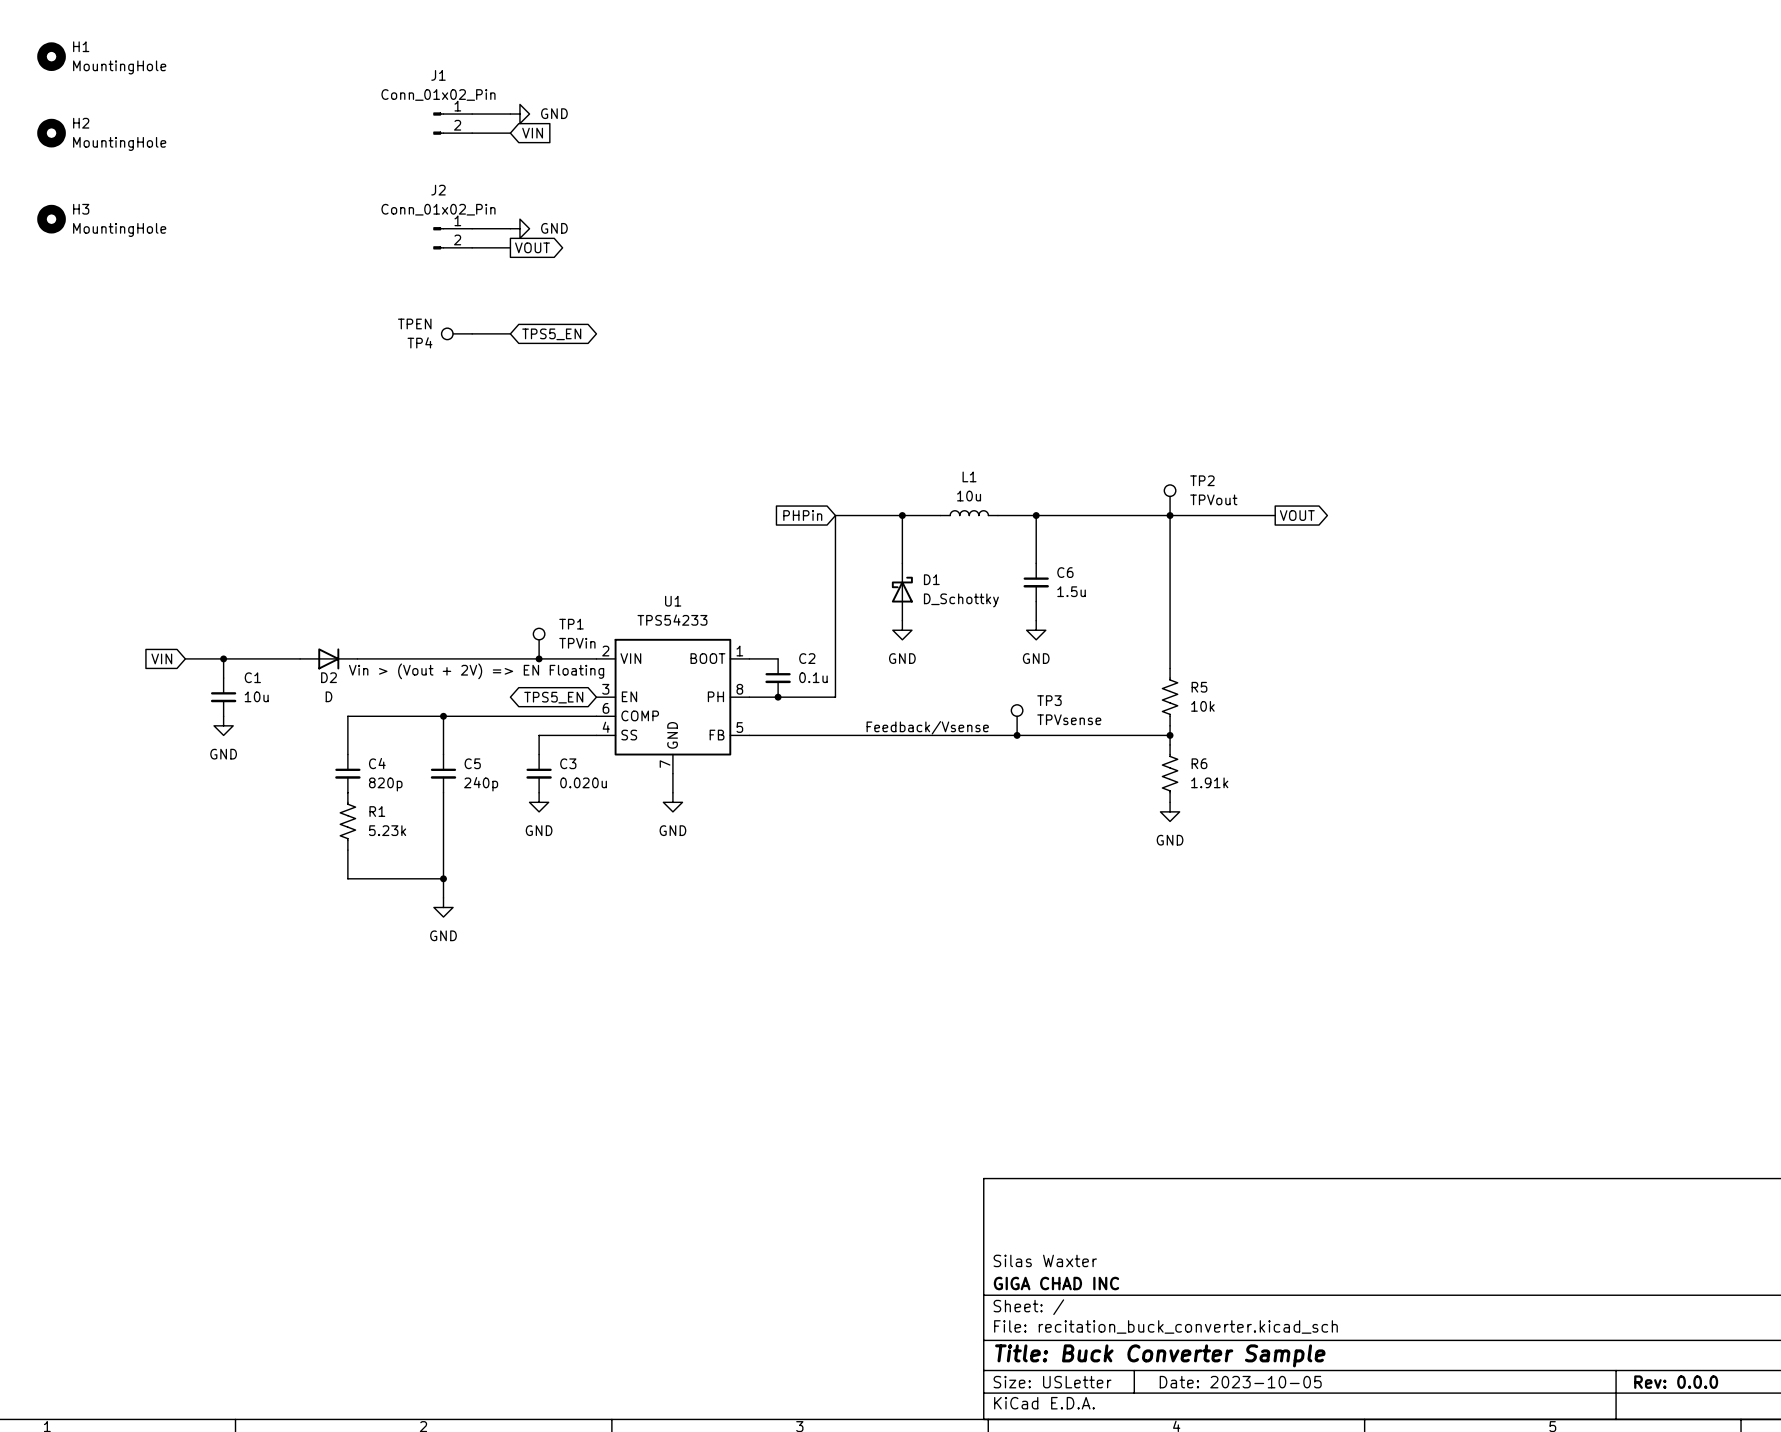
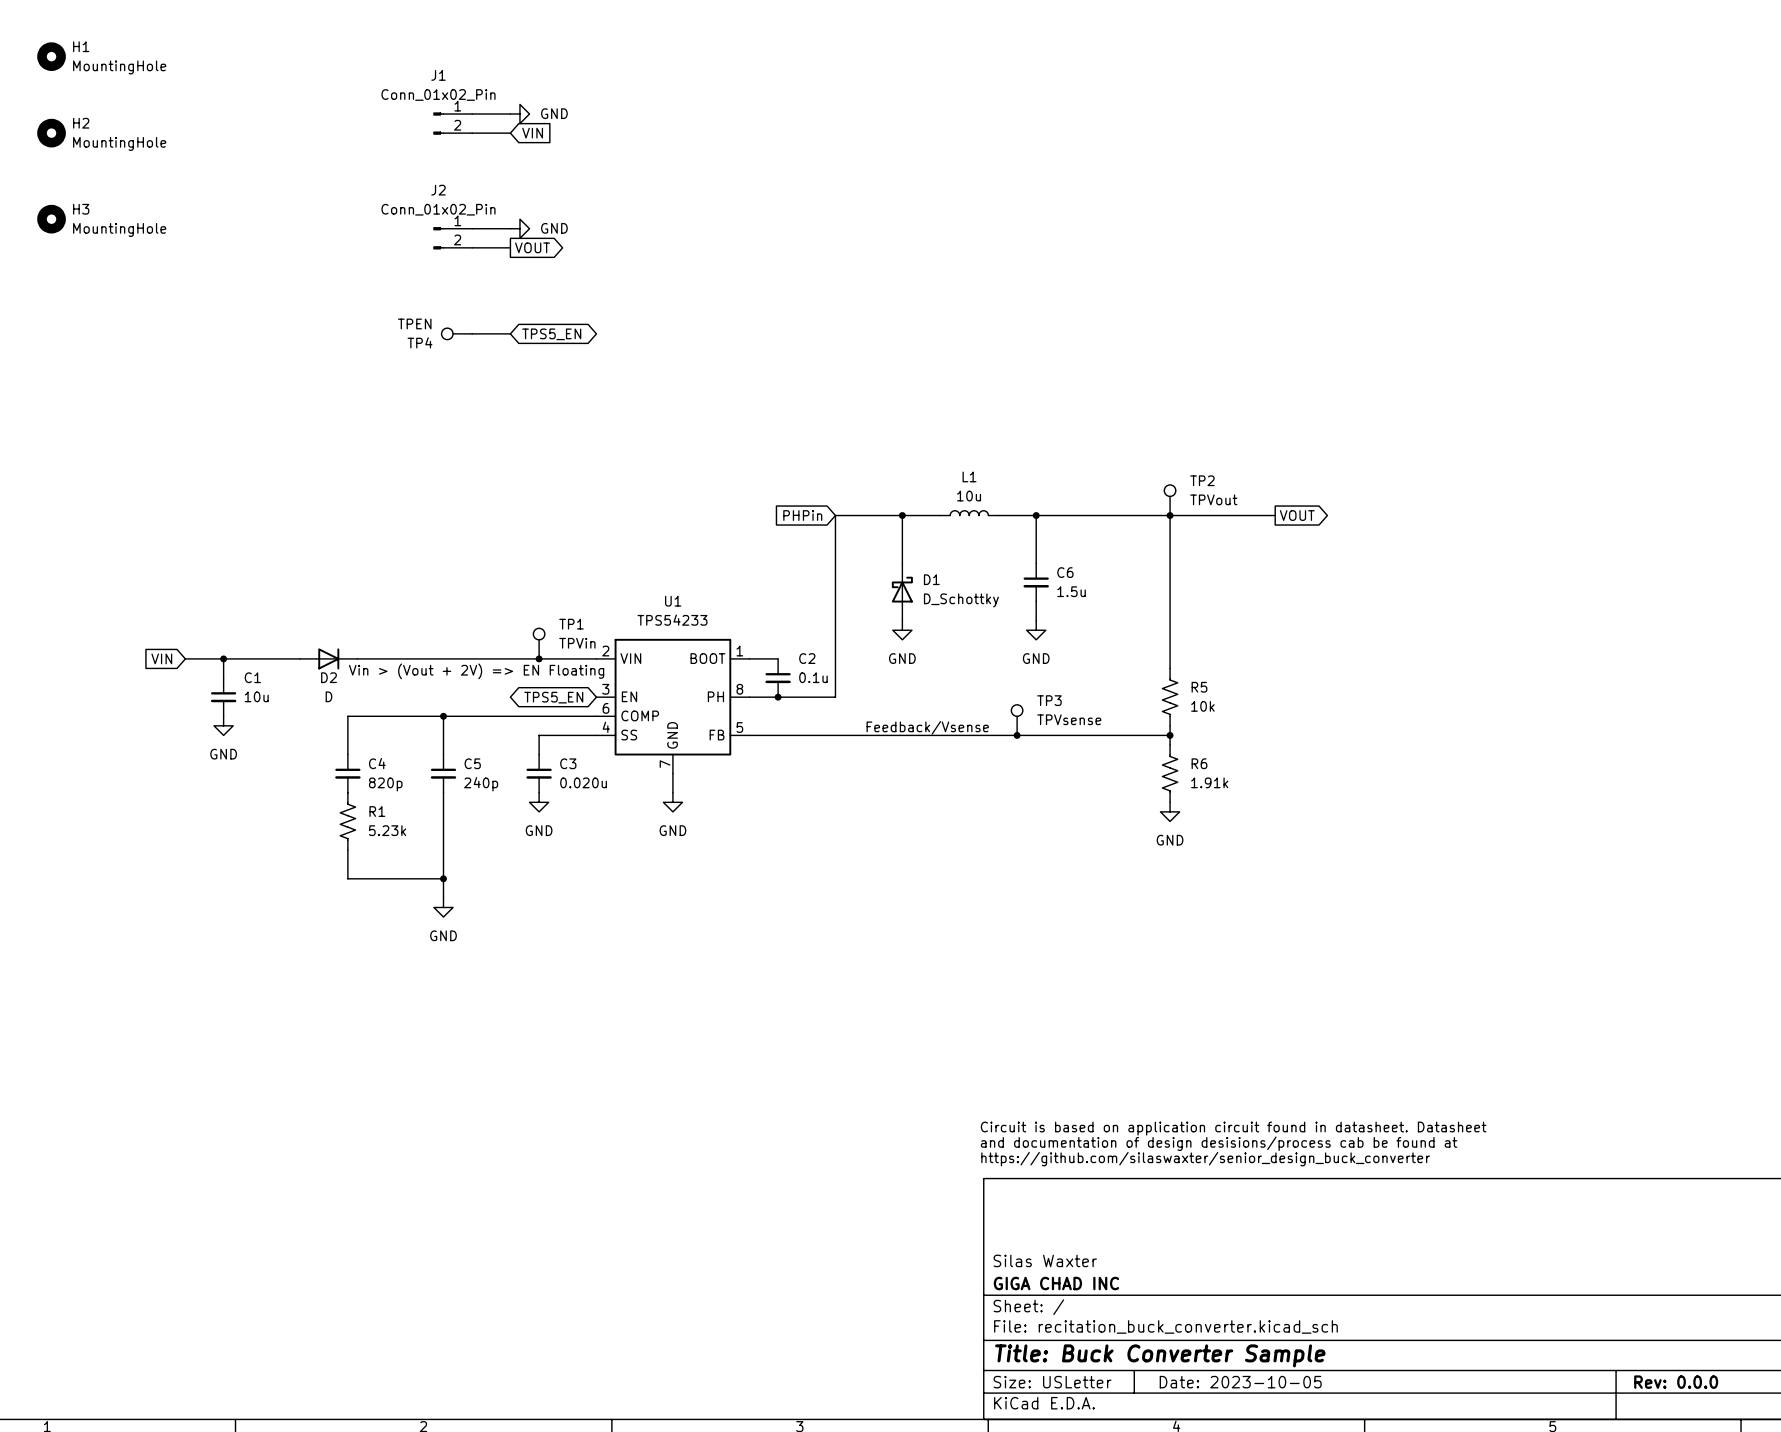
text: none -> Circuit is based on application circuit found in datasheet. Datasheet (1233, 1128)
text: none -> and documentation of design desisions/process cab be found at (1219, 1143)
text: none -> https://github.com/silaswaxter/senior_design_buck_converter (1205, 1159)

